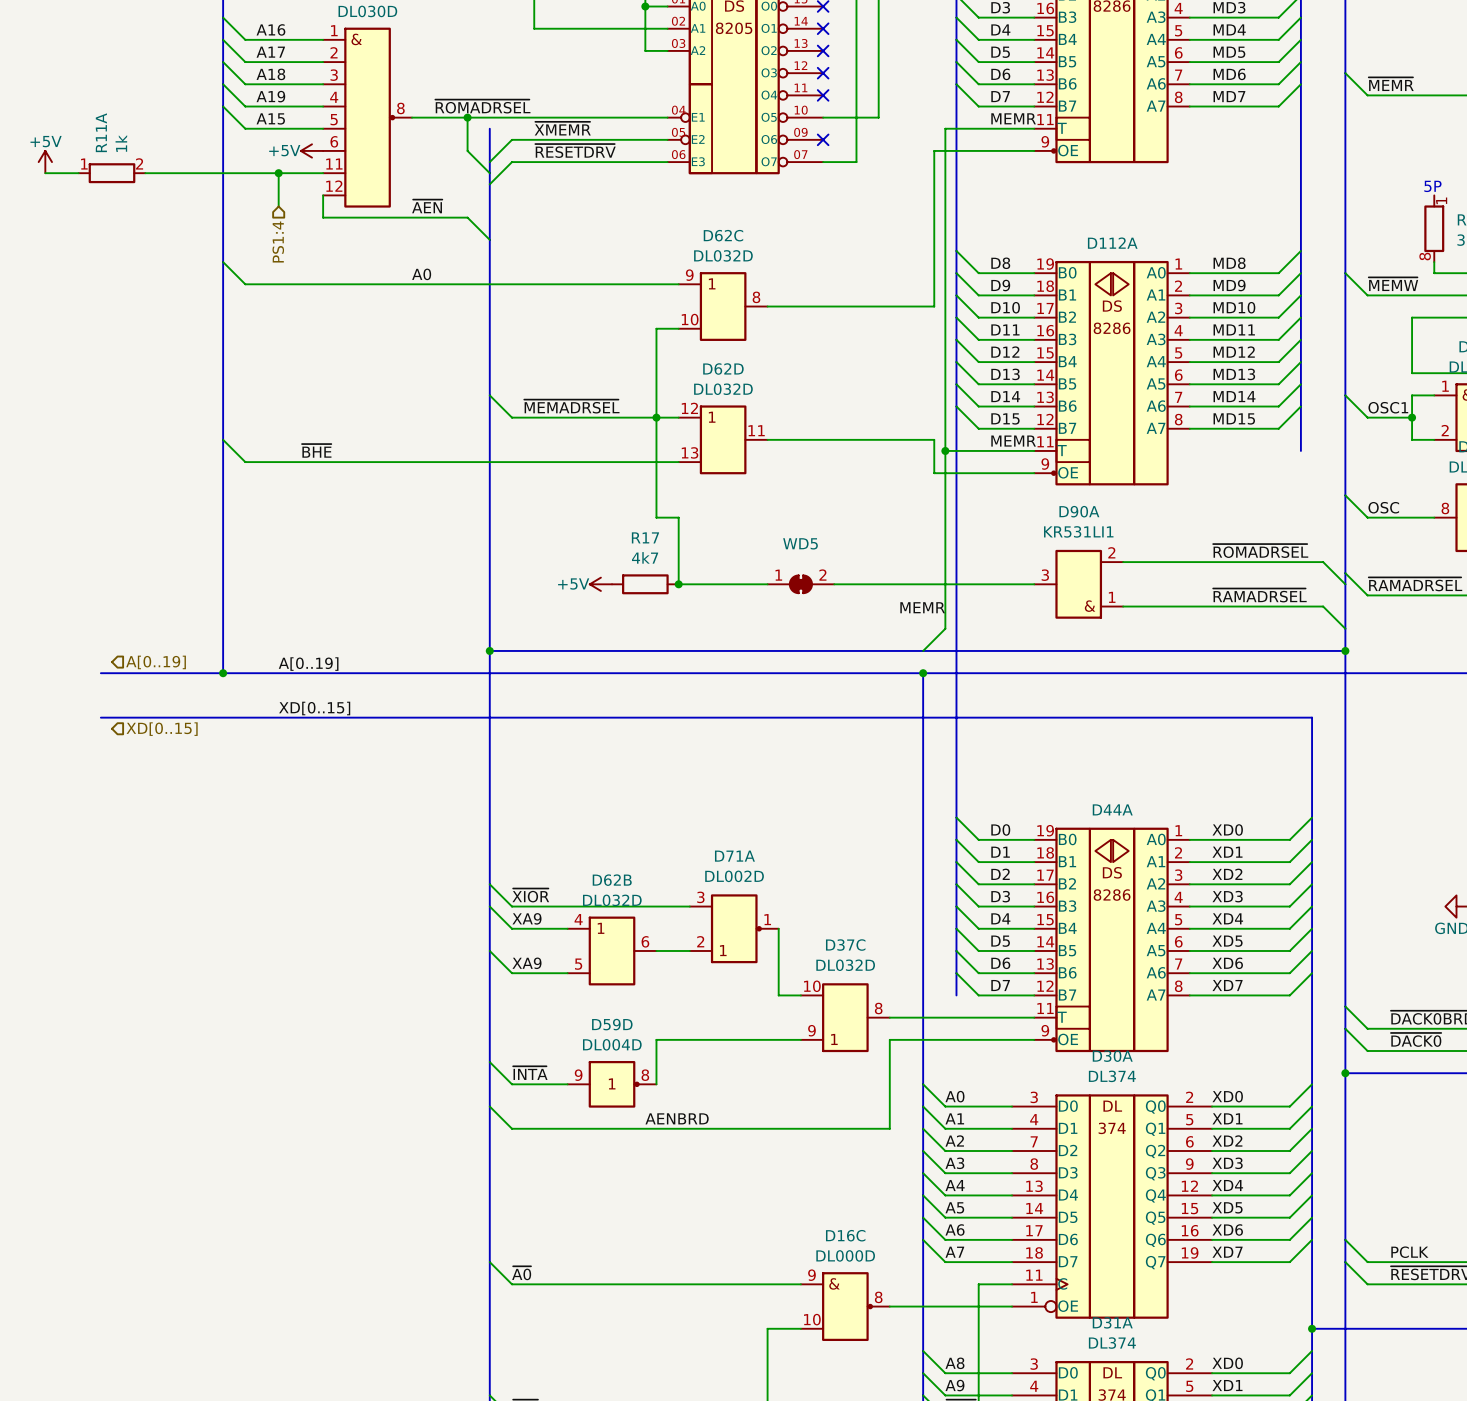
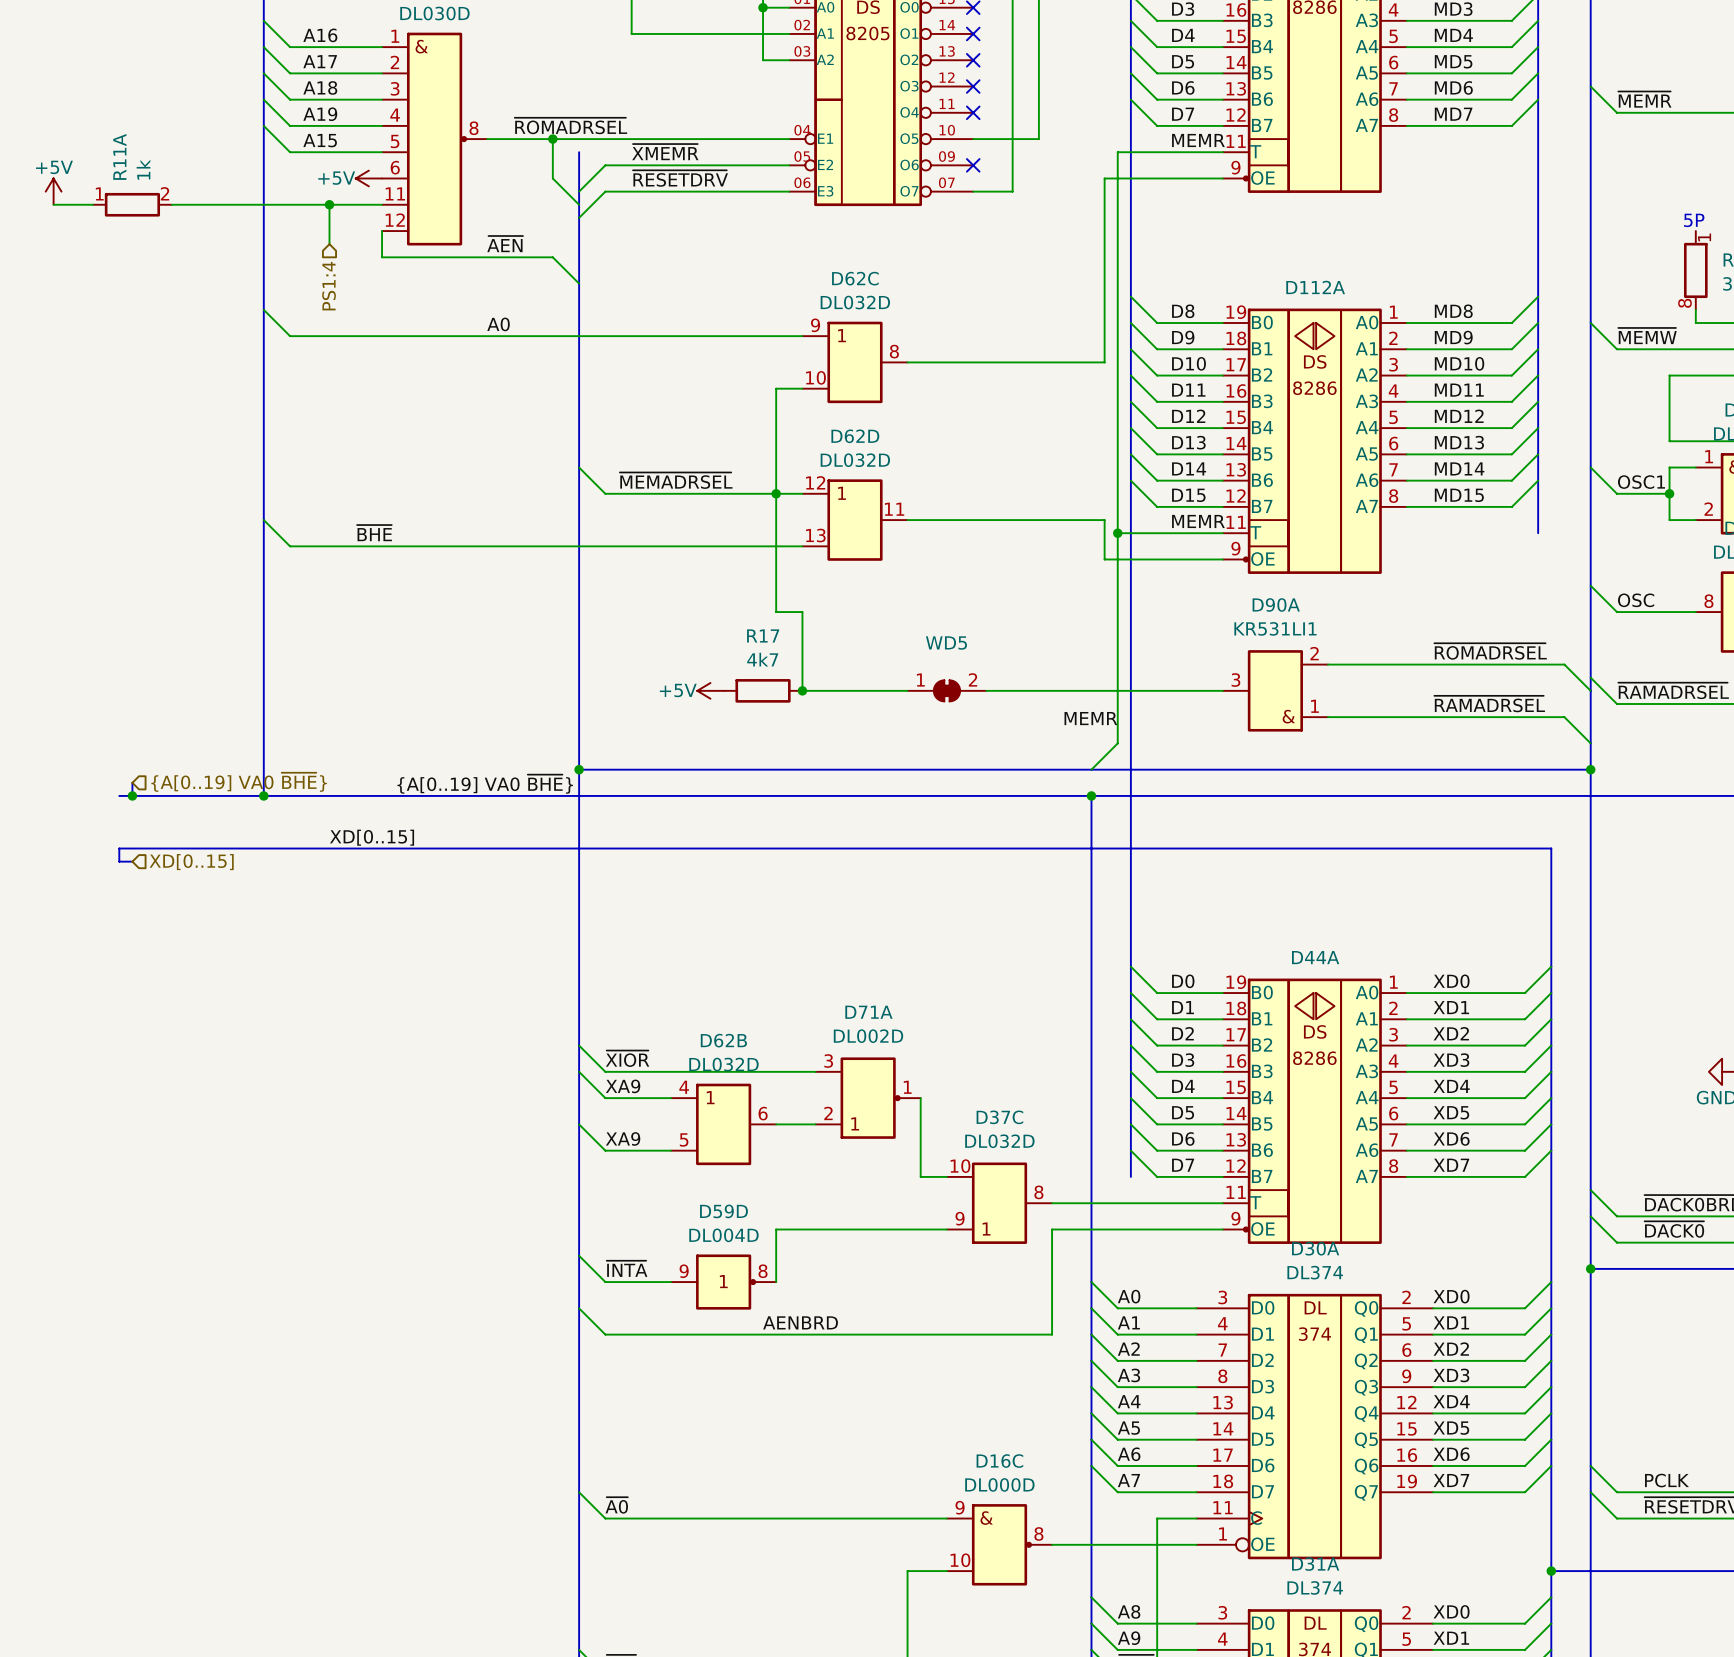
bus: none -> (132, 782) (132, 795)
hierarchical label: A[0..19] (156, 662) -> {A[0..19] VA0 ~{BHE}} (239, 782)
label: none -> {A[0..19] VA0 ~{BHE}} (485, 784)
label: A[0..19] (308, 664) -> none
junction: none -> (132, 795)
bus: none -> (119, 848) (119, 861) (132, 861)

